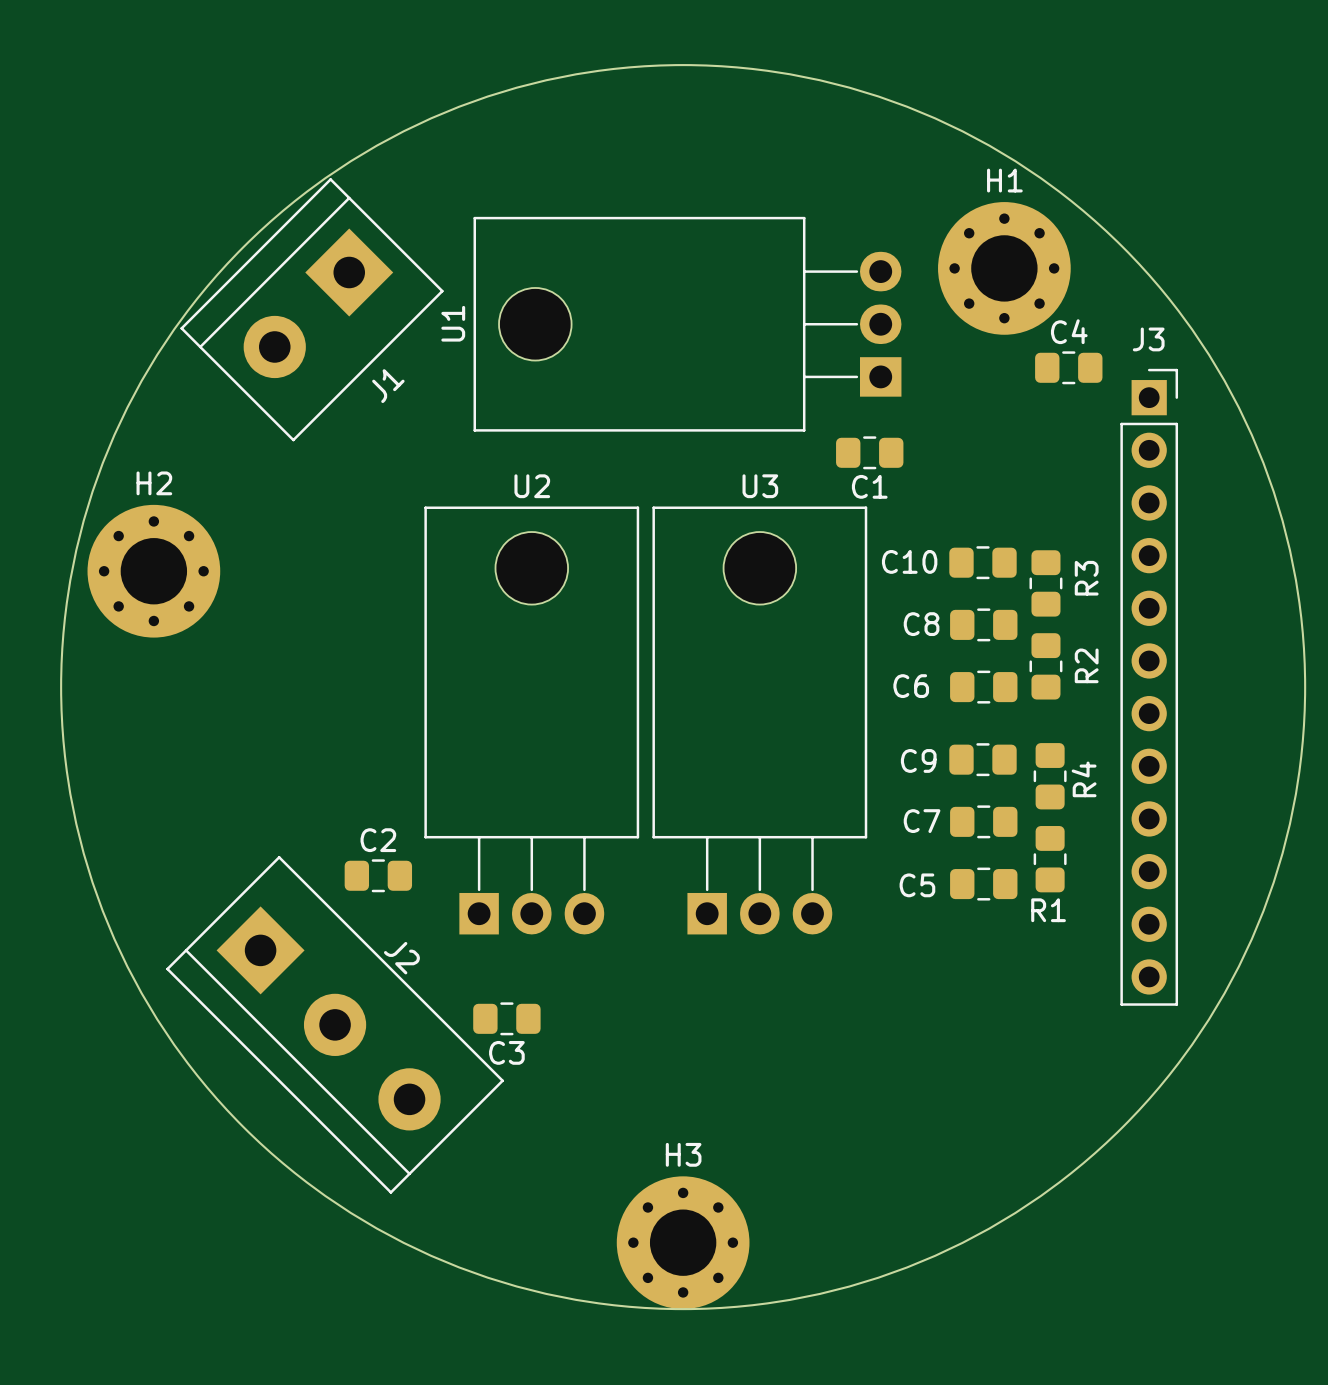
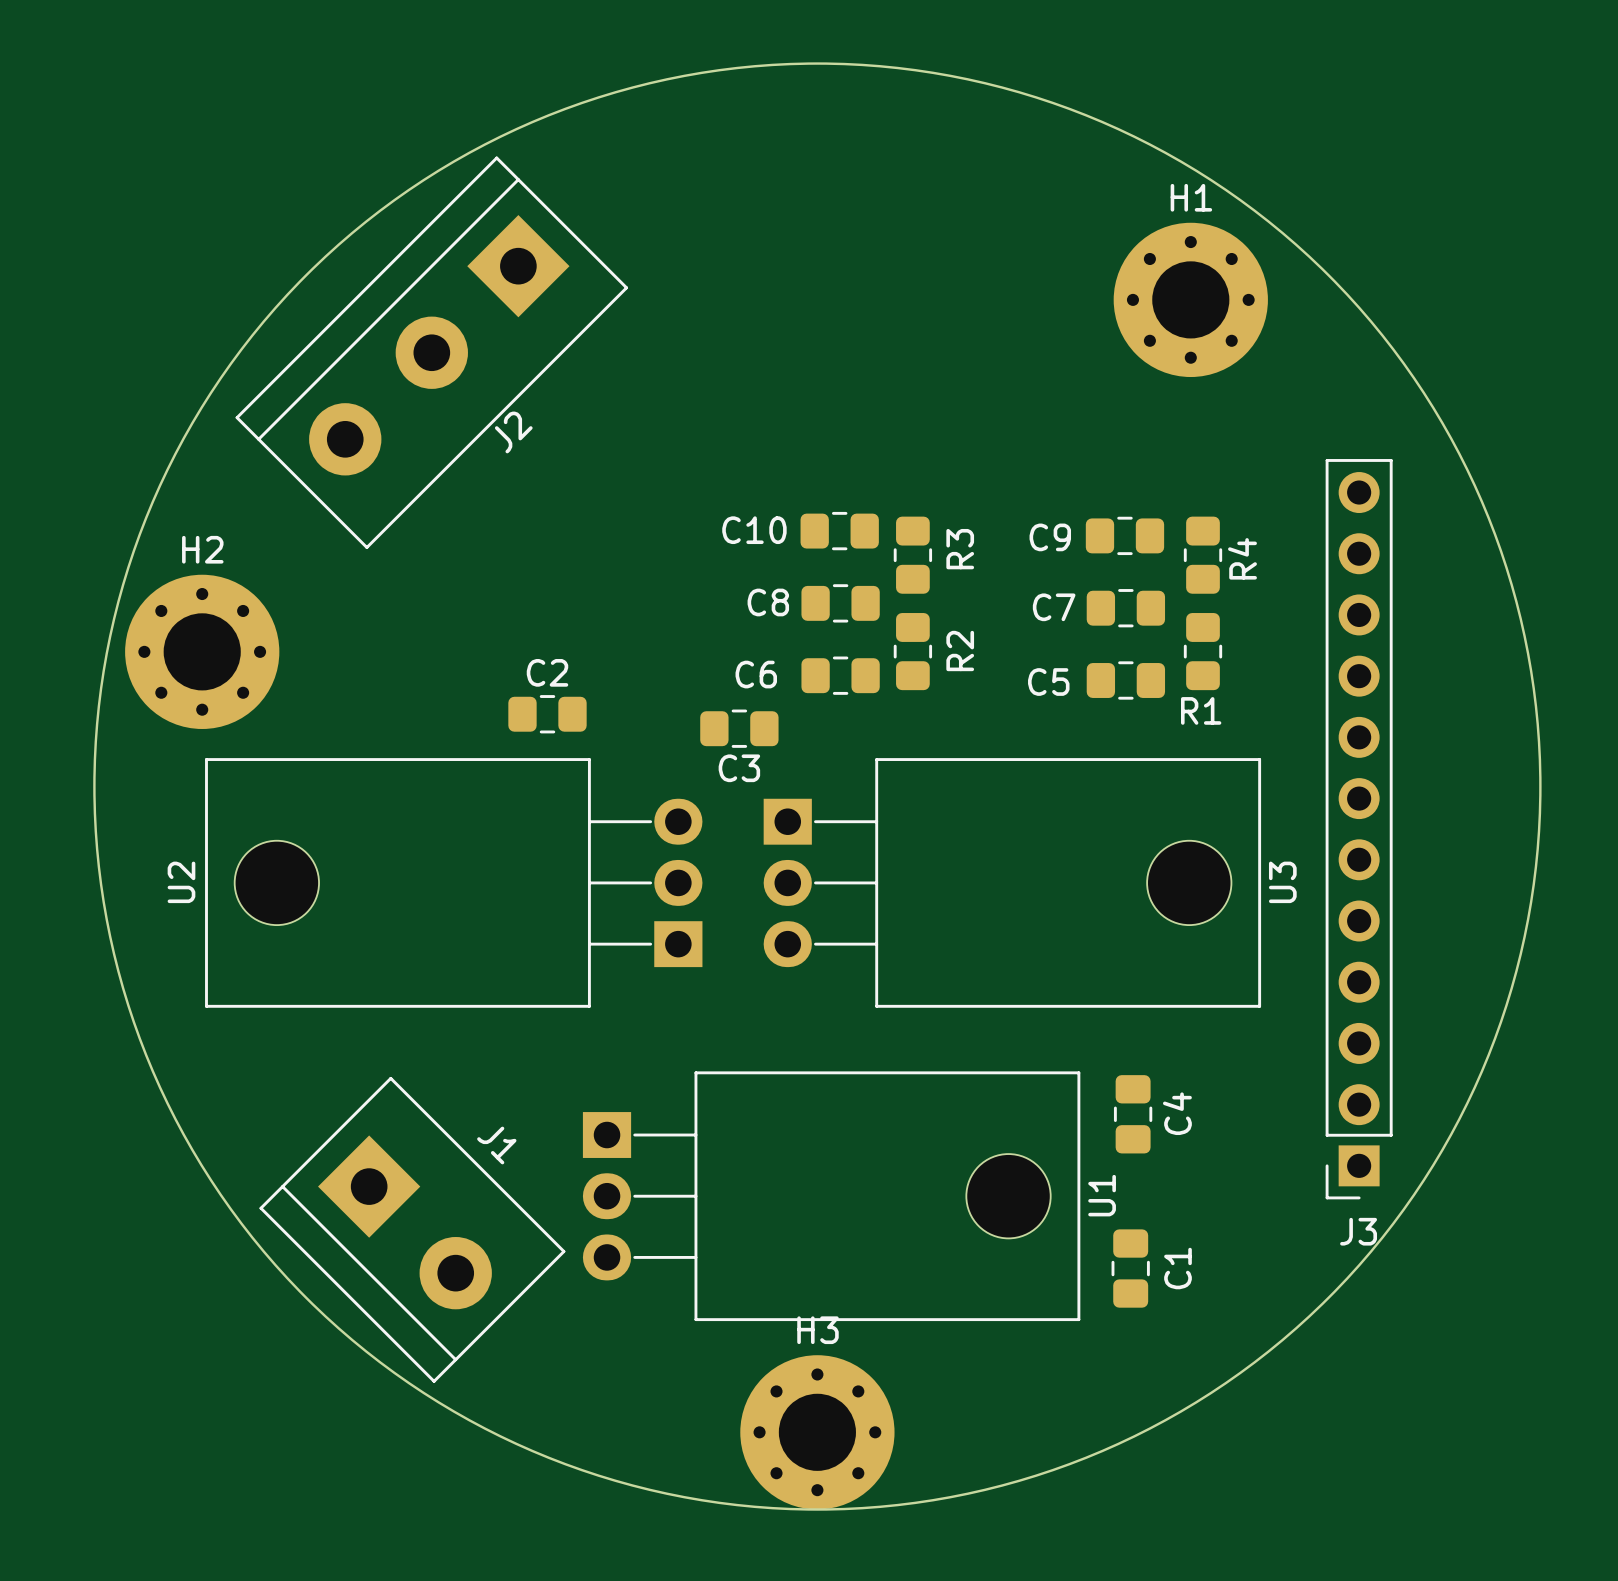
J1 rotation: 0° (312, 309) -> 90° counterclockwise (412, 1229)
J1 position: (312, 309) -> (412, 1229)
U1 rotation: 0° (687, 324) -> 180° (831, 1196)
U1 position: (687, 324) -> (831, 1196)
C4 rotation: 0° (1068, 367) -> 90° clockwise (1133, 1114)
C4 position: (1068, 367) -> (1133, 1114)
C1 rotation: 0° (869, 452) -> 90° clockwise (1130, 1268)
C1 position: (869, 452) -> (1130, 1268)
C1 name position: C1 (869, 486) -> C1 (1178, 1268)
C10 position: (982, 562) -> (839, 531)
R3 position: (1045, 583) -> (912, 555)
C8 position: (983, 624) -> (840, 603)
R2 position: (1045, 666) -> (912, 651)
C6 position: (983, 687) -> (840, 675)
J3 rotation: 0° (1149, 687) -> 180° (1359, 829)
U2 rotation: 0° (531, 720) -> 90° counterclockwise (453, 882)
U3 rotation: 0° (759, 720) -> 90° clockwise (1012, 882)
C9 position: (982, 759) -> (1124, 535)
R4 position: (1050, 776) -> (1203, 555)
C7 position: (983, 821) -> (1125, 608)
R1 position: (1050, 859) -> (1203, 651)
C2 position: (378, 875) -> (547, 714)
C5 position: (983, 884) -> (1125, 680)
C3 position: (506, 1018) -> (739, 728)
J2 rotation: 0° (335, 1024) -> 90° clockwise (431, 352)
J2 position: (335, 1024) -> (431, 352)

